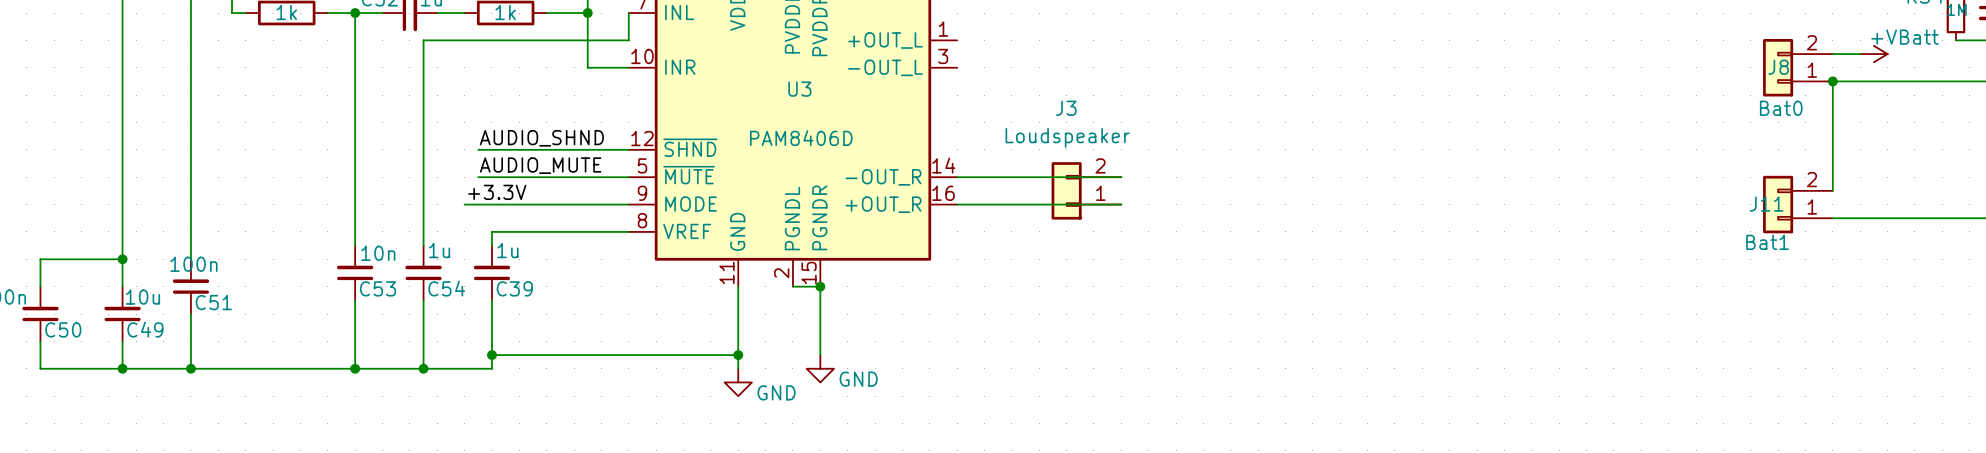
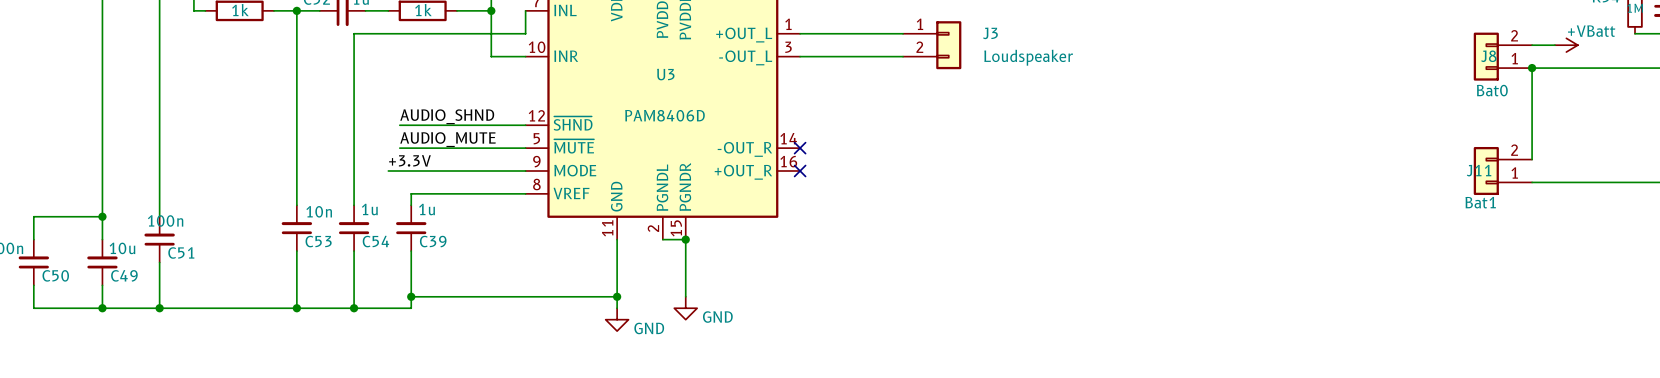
wire: none -> (800, 33) (903, 33)
wire: none -> (800, 56) (903, 56)
J3 name position: J3 (1066, 108) -> J3 (990, 33)
J3 value position: Loudspeaker (1067, 137) -> Loudspeaker (1028, 57)
wire: (957, 177) (1121, 177) -> none
no-connect mark: none -> (800, 148)
J3 rotation: 0° (1066, 190) -> 180° (948, 45)
J3 position: (1086, 190) -> (932, 45)
wire: (957, 204) (1121, 204) -> none
no-connect mark: none -> (800, 171)

